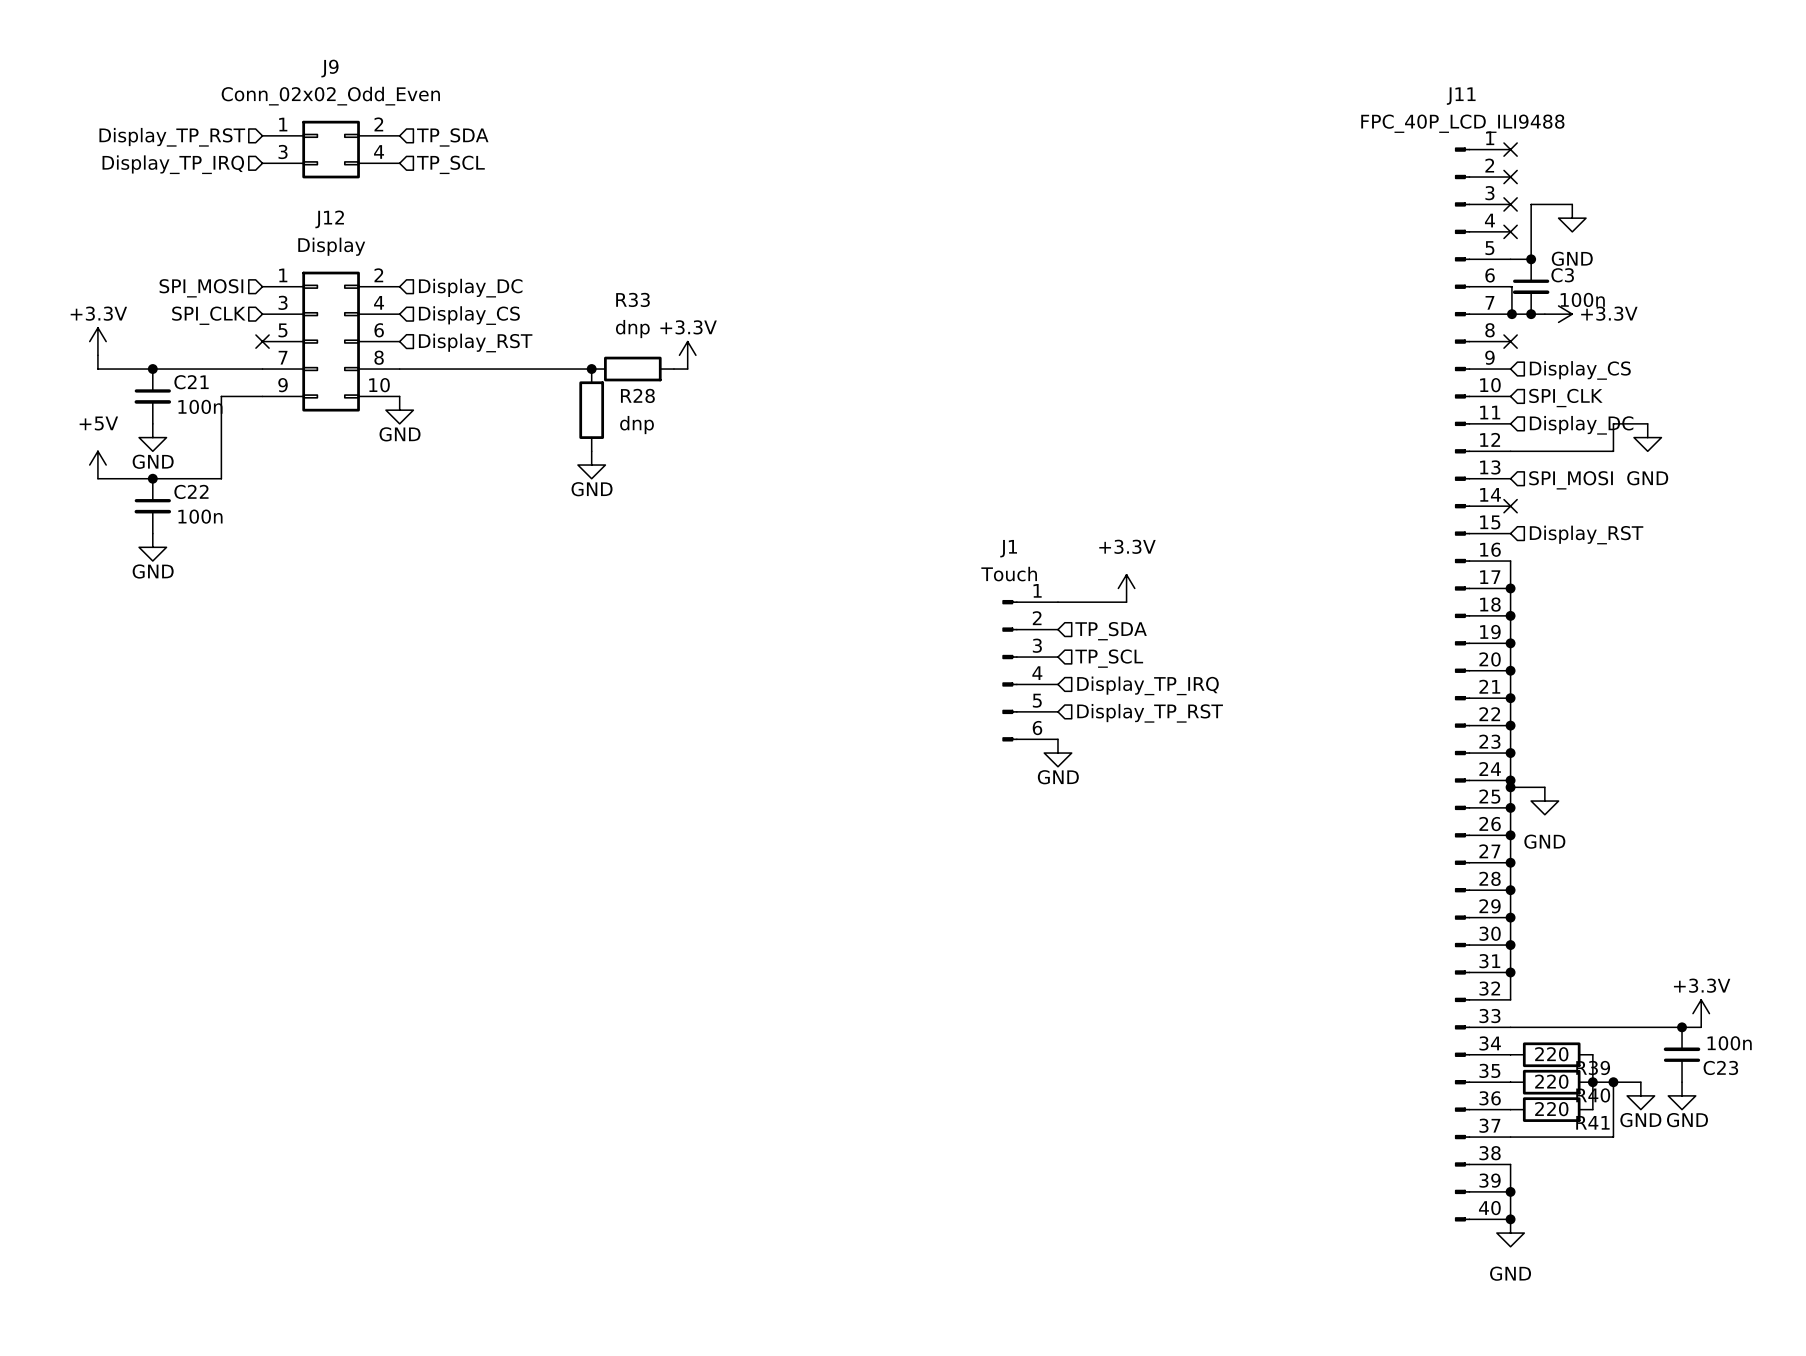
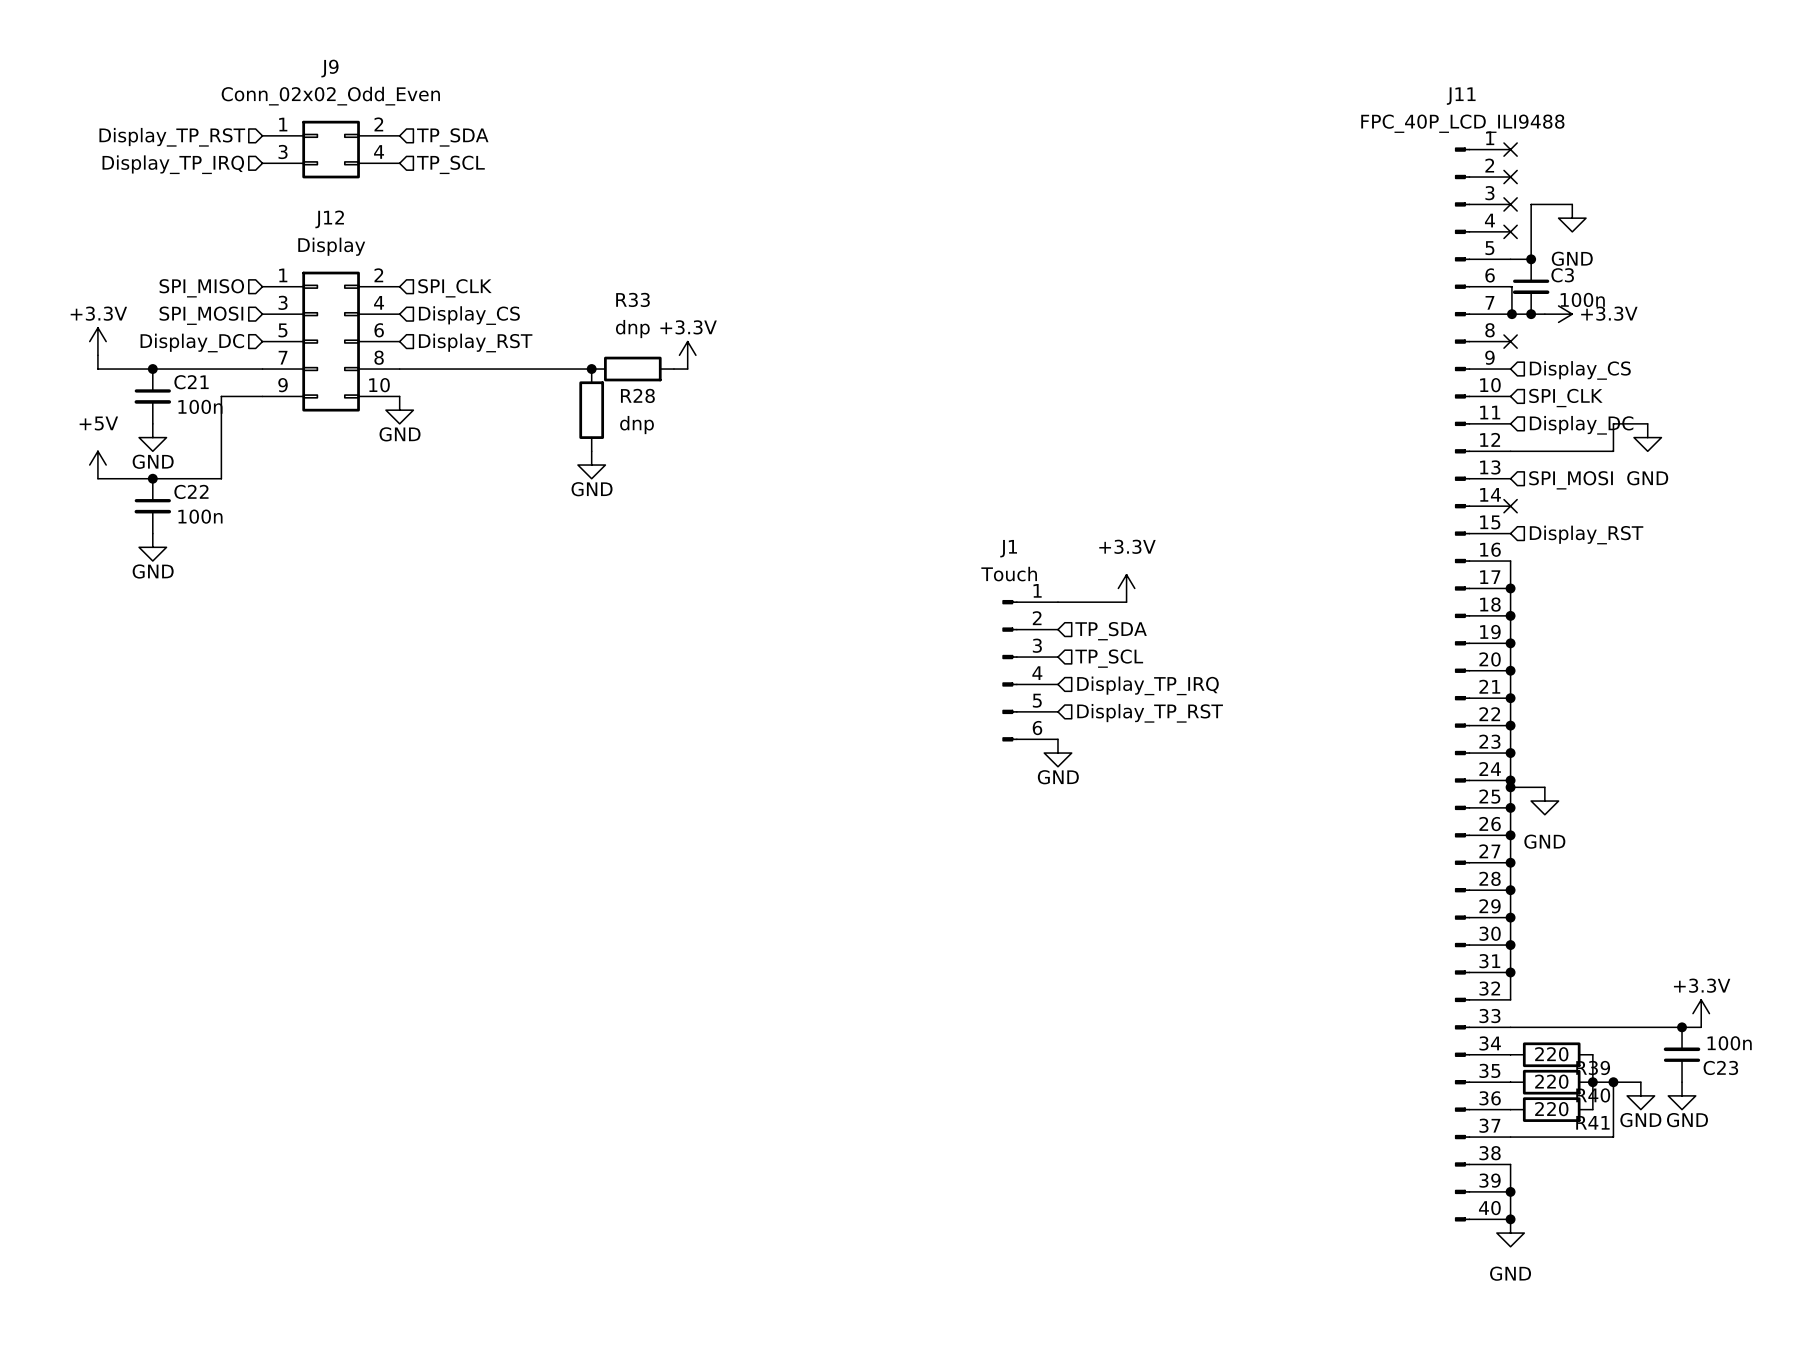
hierarchical label: SPI_MOSI (201, 288) -> SPI_MISO (201, 288)
hierarchical label: Display_DC (470, 288) -> SPI_CLK (455, 288)
hierarchical label: SPI_CLK (208, 315) -> SPI_MOSI (201, 315)
no-connect mark: (262, 341) -> none
hierarchical label: none -> Display_DC (192, 343)

